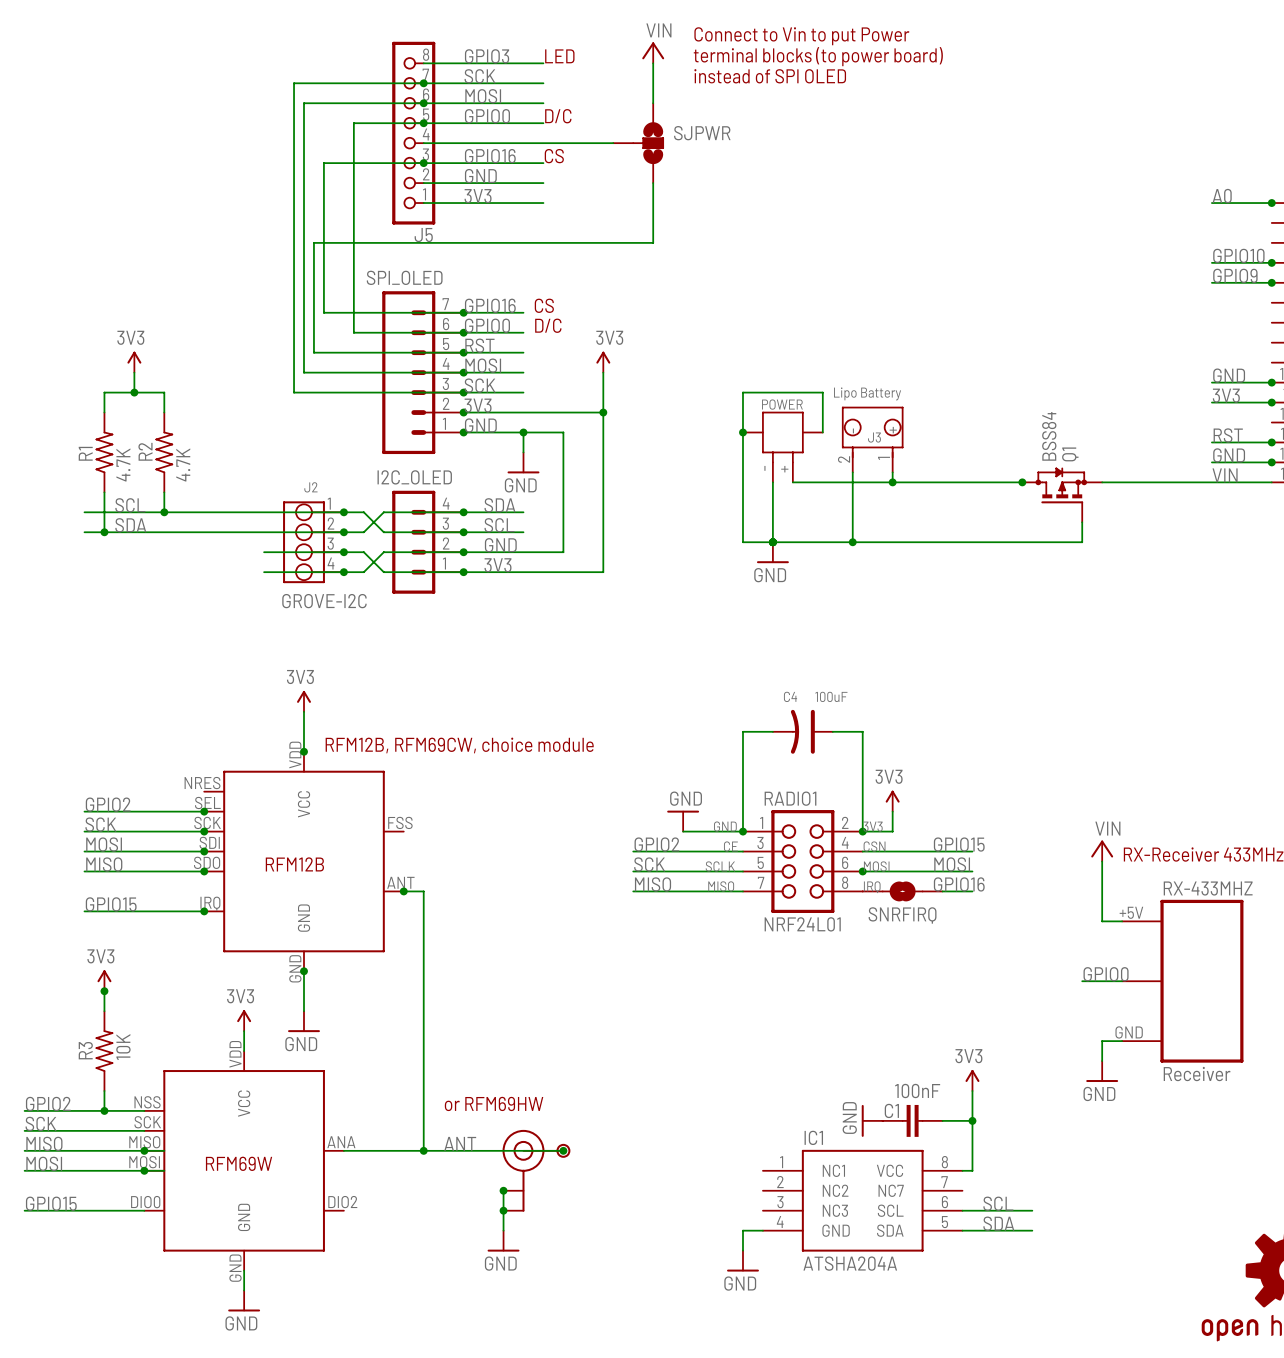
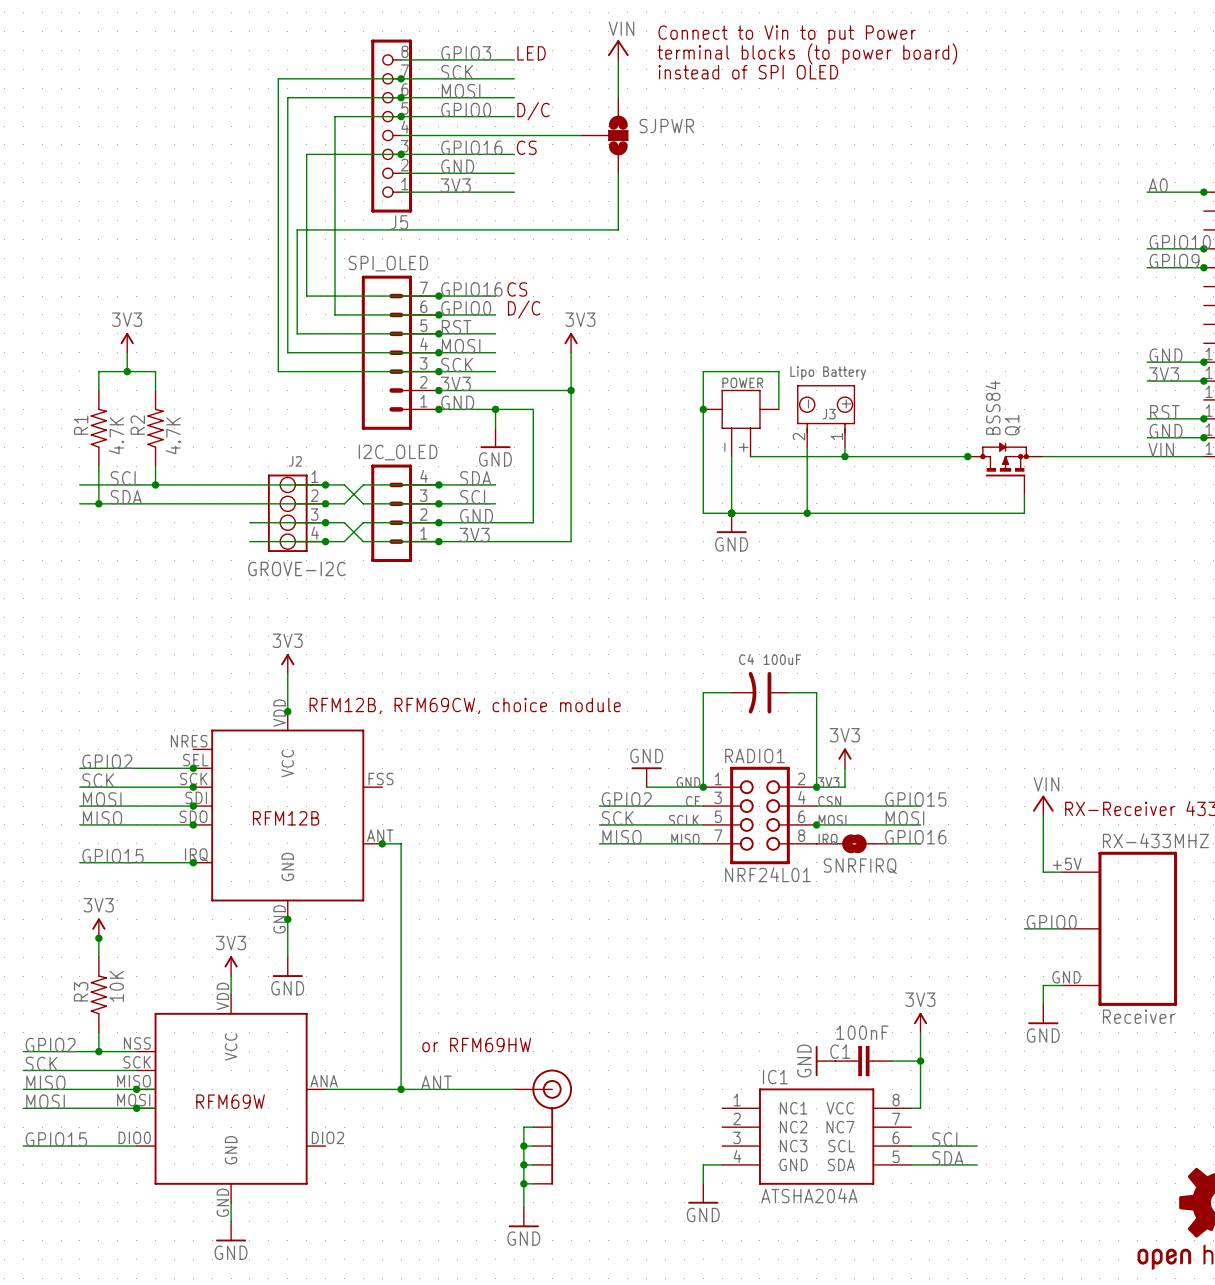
part: (563, 1150) -> none
junction: (563, 1150) -> none
part: (532, 1170) -> none
wire: (503, 1190) (503, 1230) -> none
junction: (503, 1190) -> none
wire: none -> (533, 1127) (523, 1127) (523, 1207)
part: none -> (543, 1127)
junction: (503, 1210) -> none
wire: none -> (523, 1146) (533, 1146)
junction: none -> (523, 1146)
wire: none -> (523, 1164) (533, 1164)
junction: none -> (523, 1164)
power symbol position: GND (503, 1241) -> GND (523, 1217)
wire: none -> (523, 1183) (533, 1183)
junction: none -> (523, 1183)

